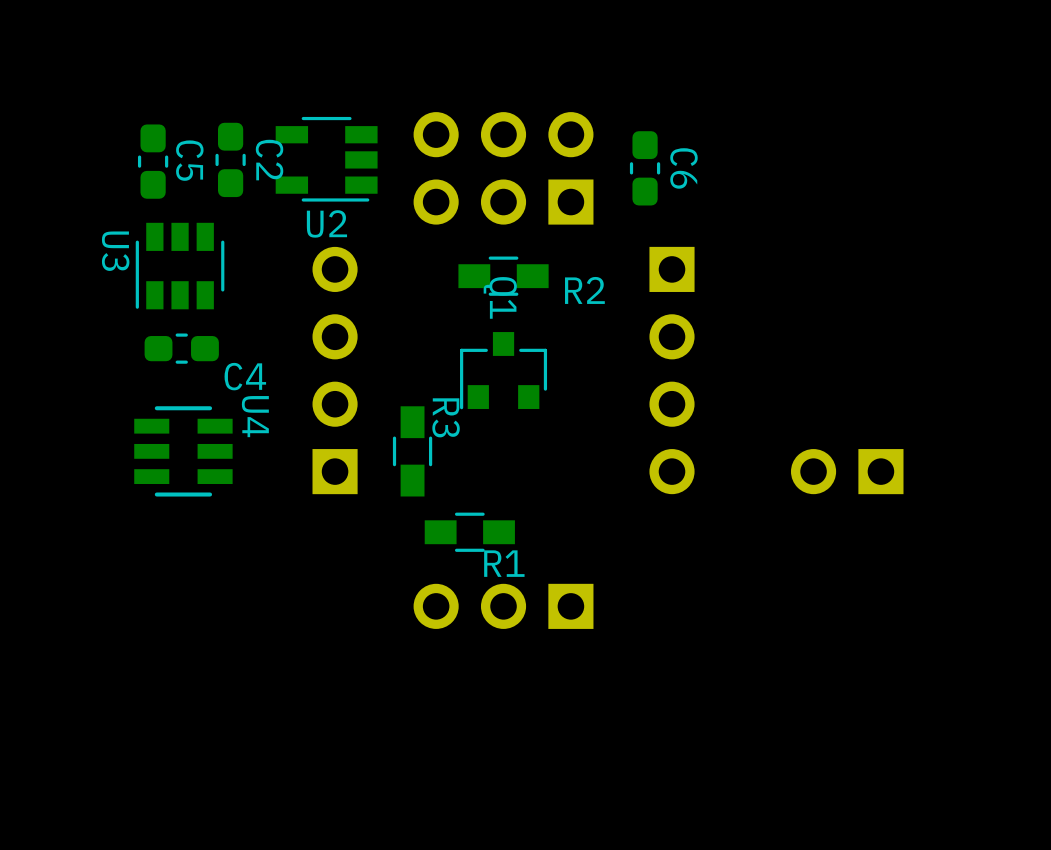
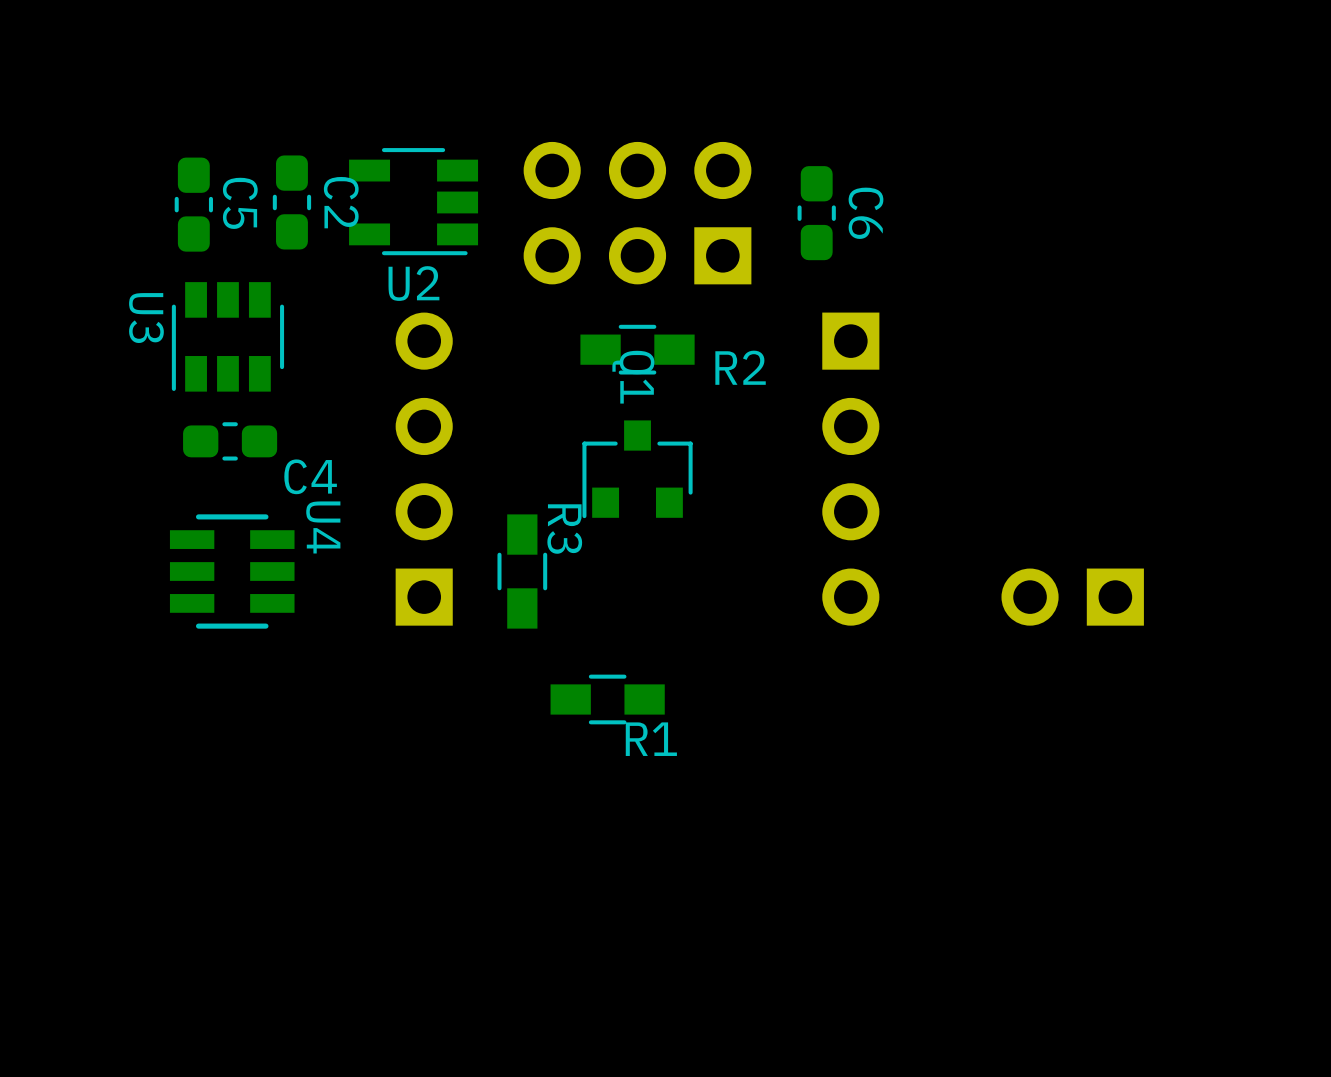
R1 position: (469, 532) -> (607, 699)
part: (503, 606) -> none

